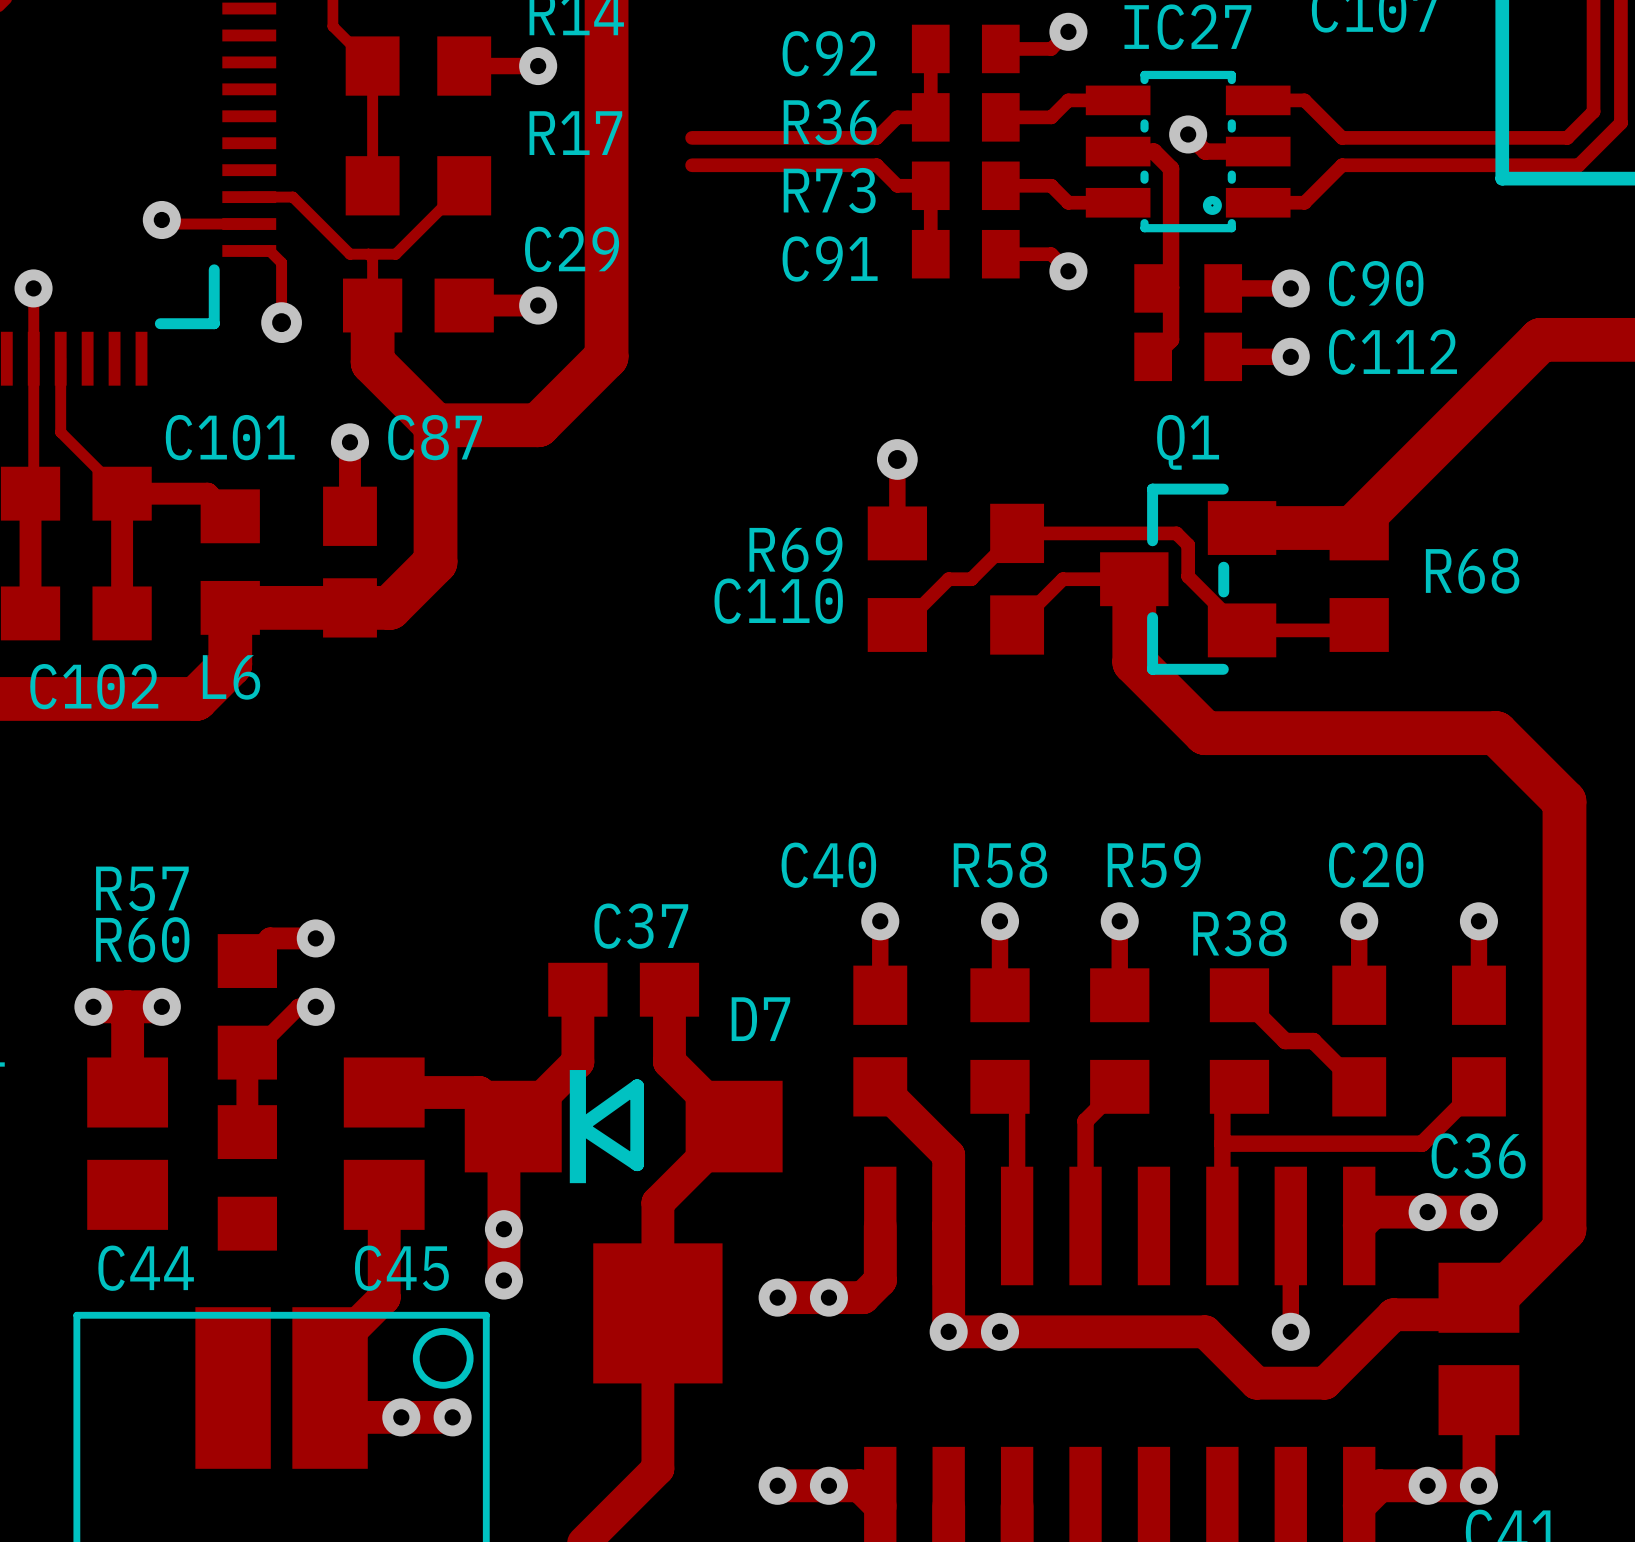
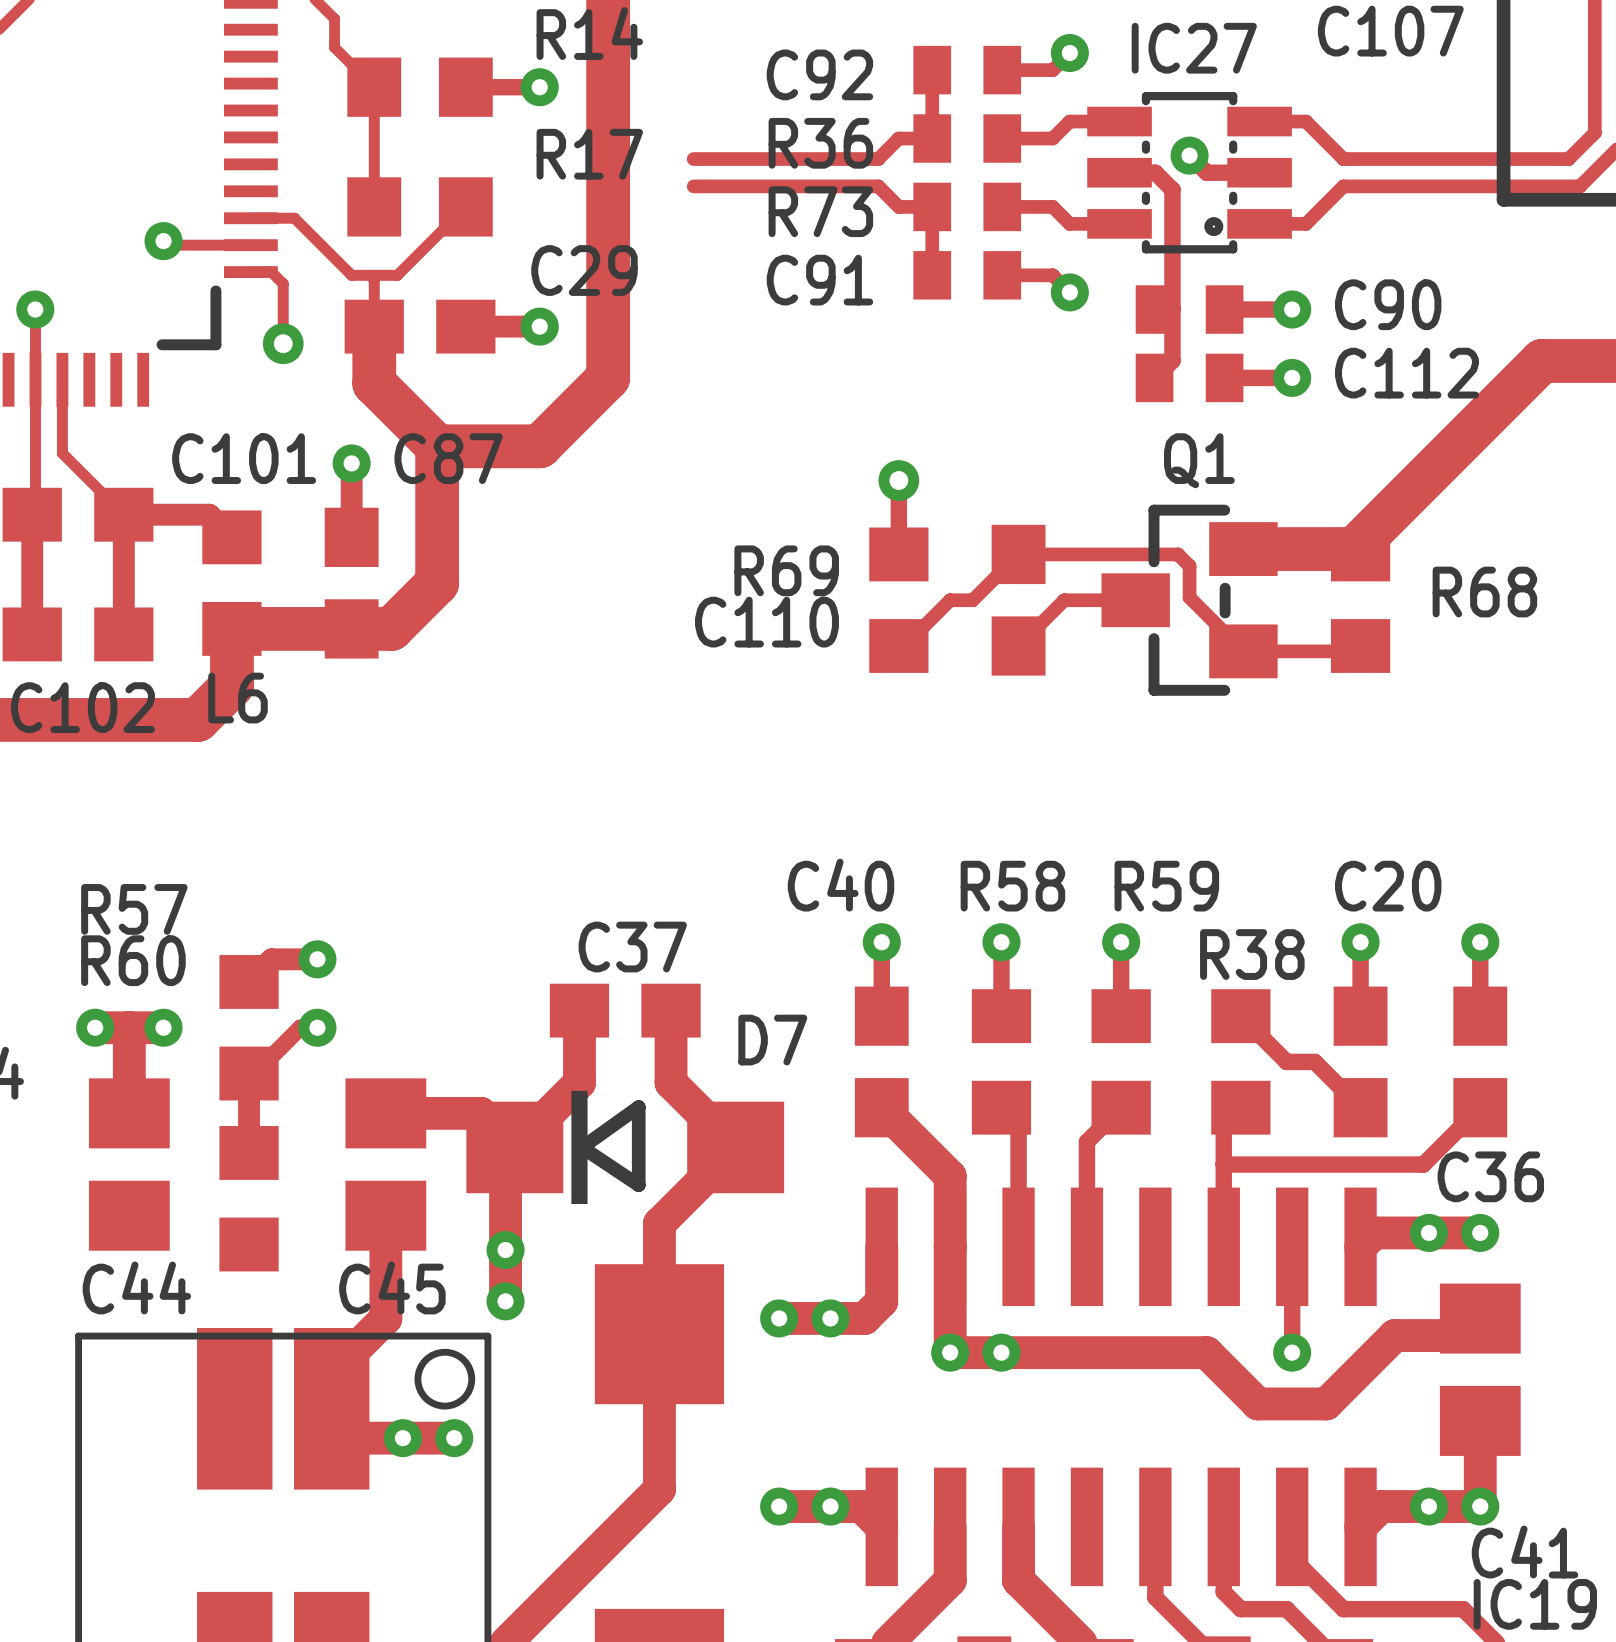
track: (1134, 579) (1134, 662) (1205, 733) (1496, 733) (1564, 801) (1564, 1229) (1495, 1297) (1478, 1297) -> none

